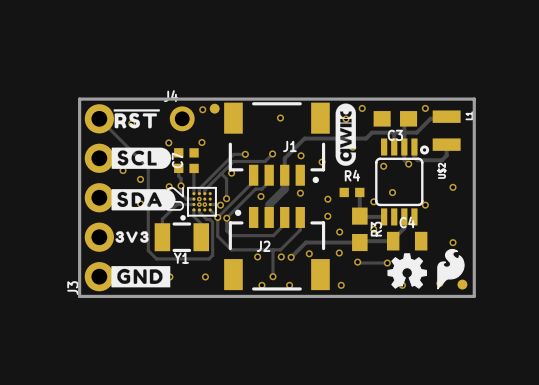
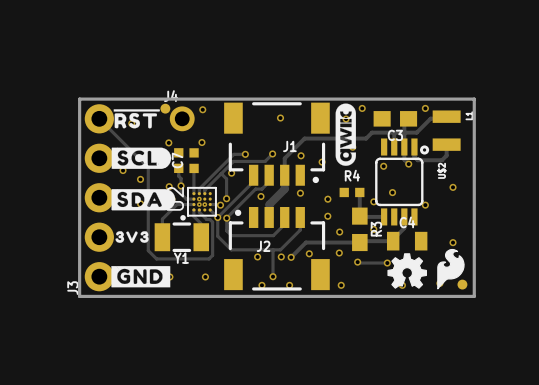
part position: (214, 108) -> (165, 108)

